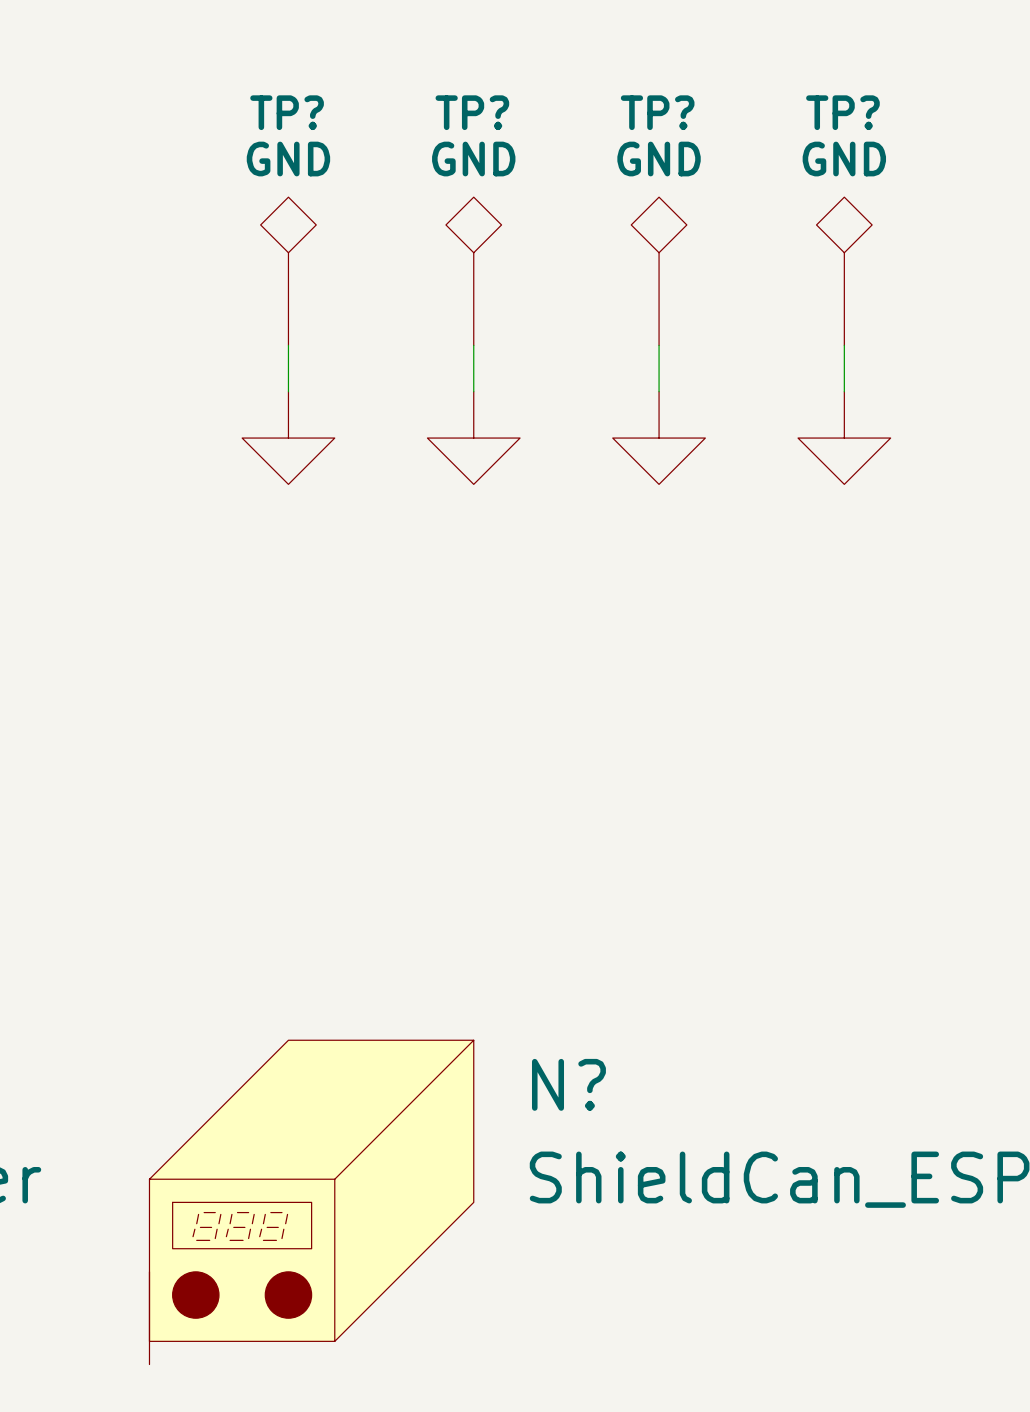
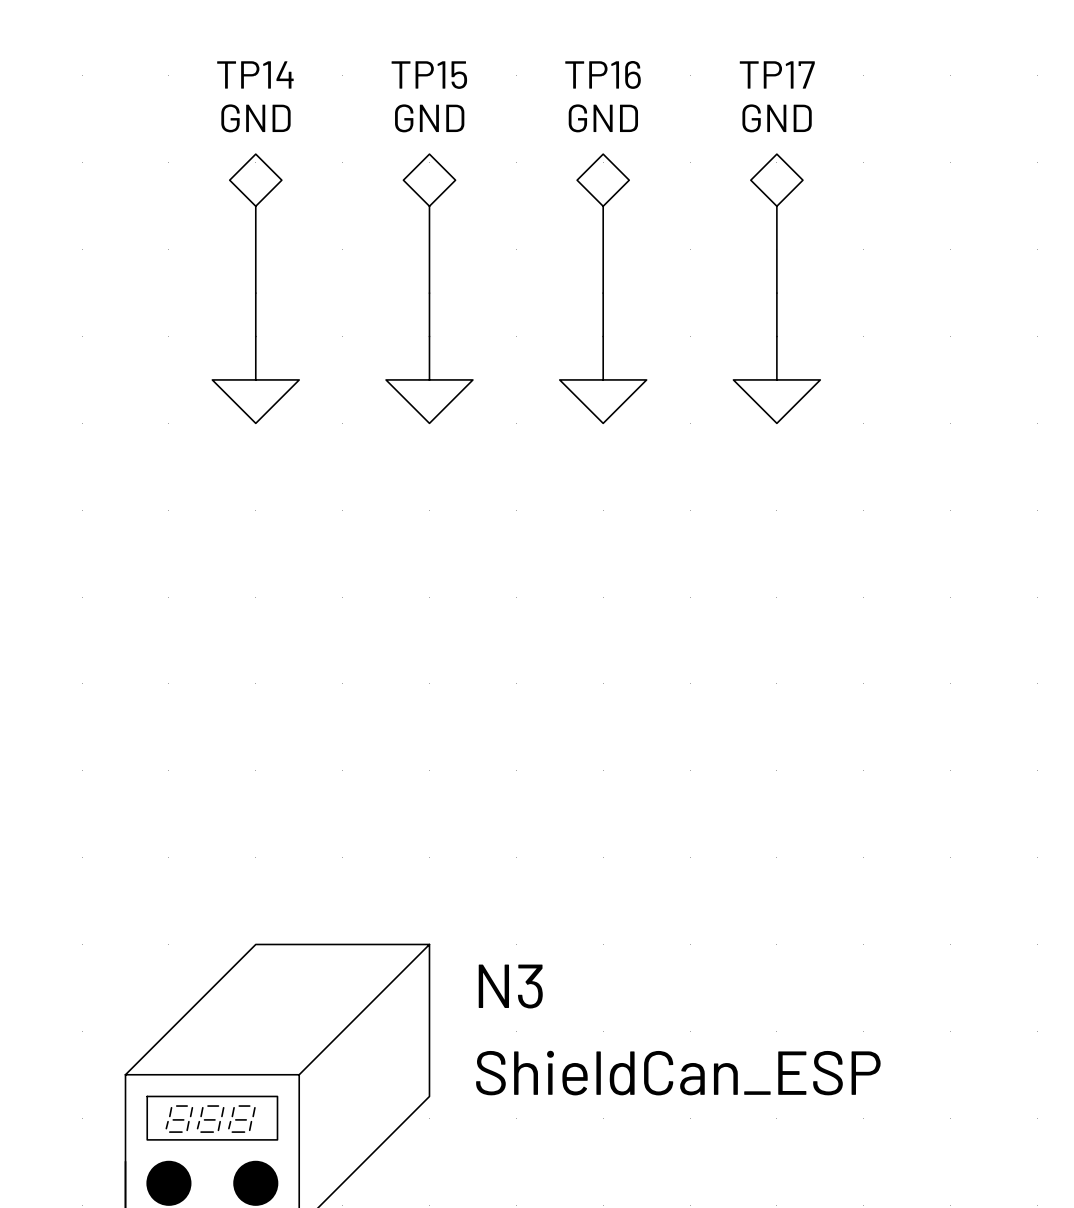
TP? name: TP? (287, 112) -> TP14 (255, 74)
TP? name: TP? (472, 112) -> TP15 (429, 75)
TP? name: TP? (657, 112) -> TP16 (603, 74)
TP? name: TP? (842, 112) -> TP17 (777, 74)
N? name: N? (568, 1084) -> N3 (510, 986)

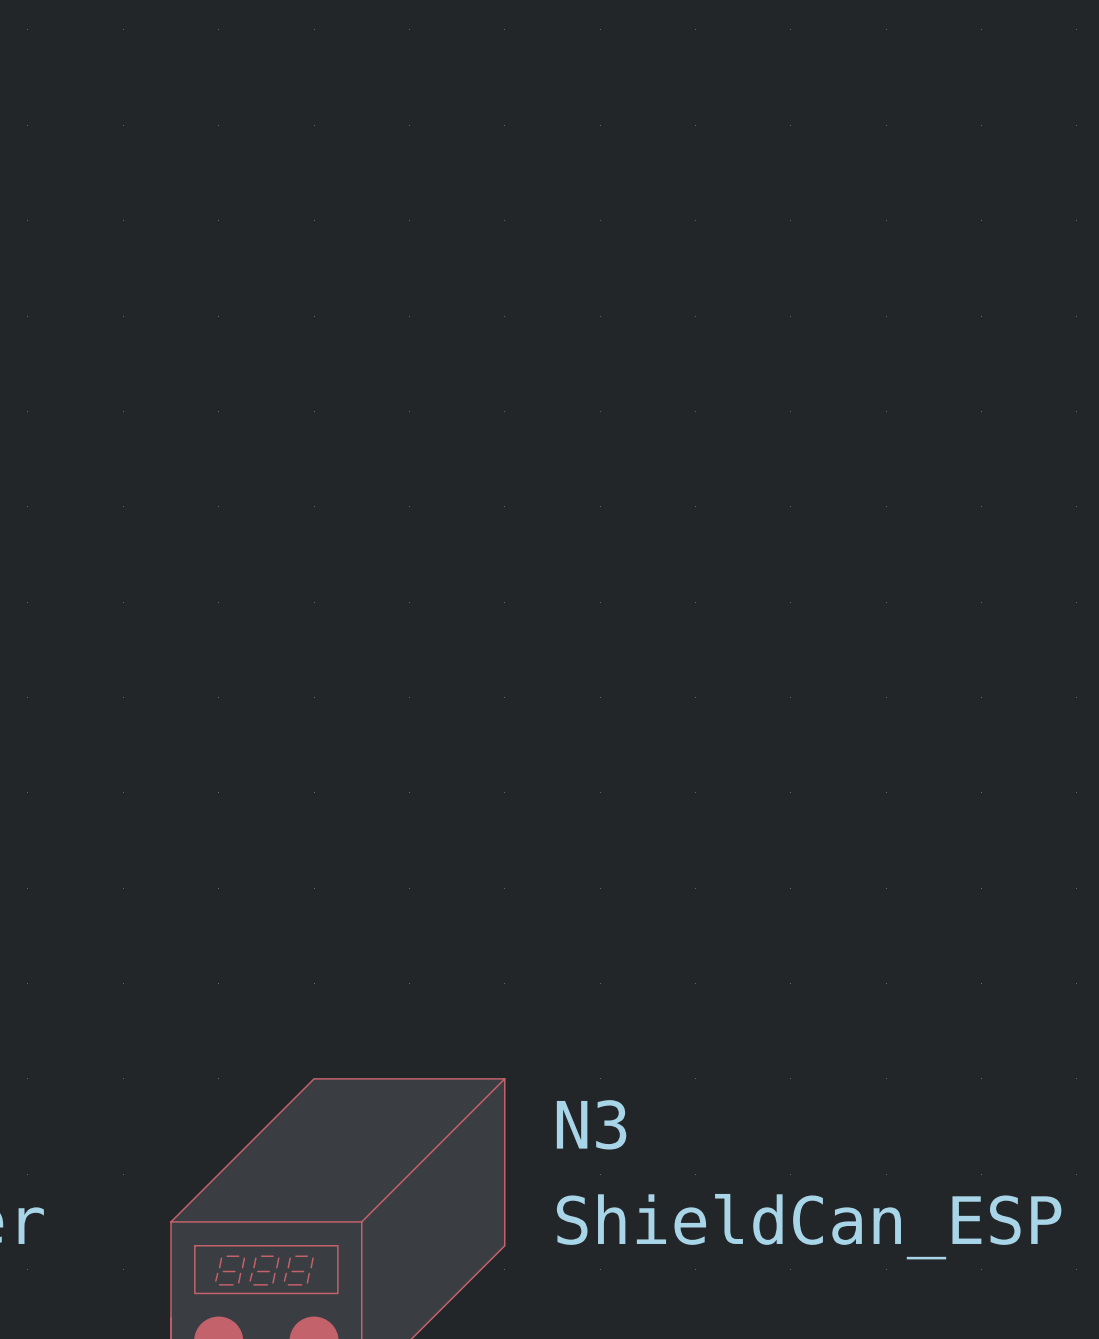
TP14: GND (255, 223) -> none
TP15: GND (429, 223) -> none
TP16: GND (603, 223) -> none
TP17: GND (776, 223) -> none
wire: (255, 293) (255, 336) -> none
wire: (429, 293) (429, 336) -> none
wire: (603, 293) (603, 336) -> none
wire: (776, 293) (776, 336) -> none
power symbol: (255, 379) -> none
power symbol: (429, 379) -> none
power symbol: (603, 379) -> none
power symbol: (776, 379) -> none

